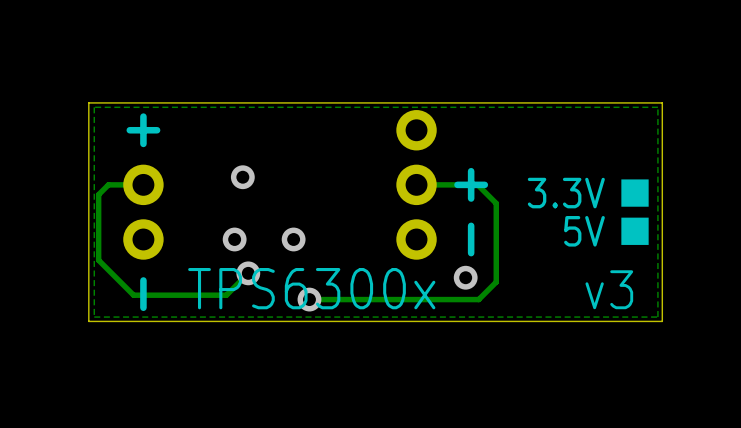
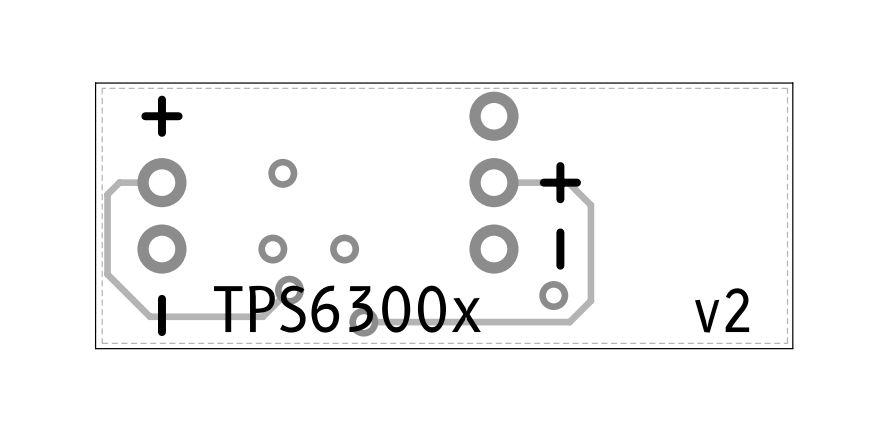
drawing: [621, 179, 649, 245] -> none
text: 3.3V (566, 193) -> none
text: 5V (584, 231) -> none
text: v3 (609, 289) -> v2 (722, 310)

